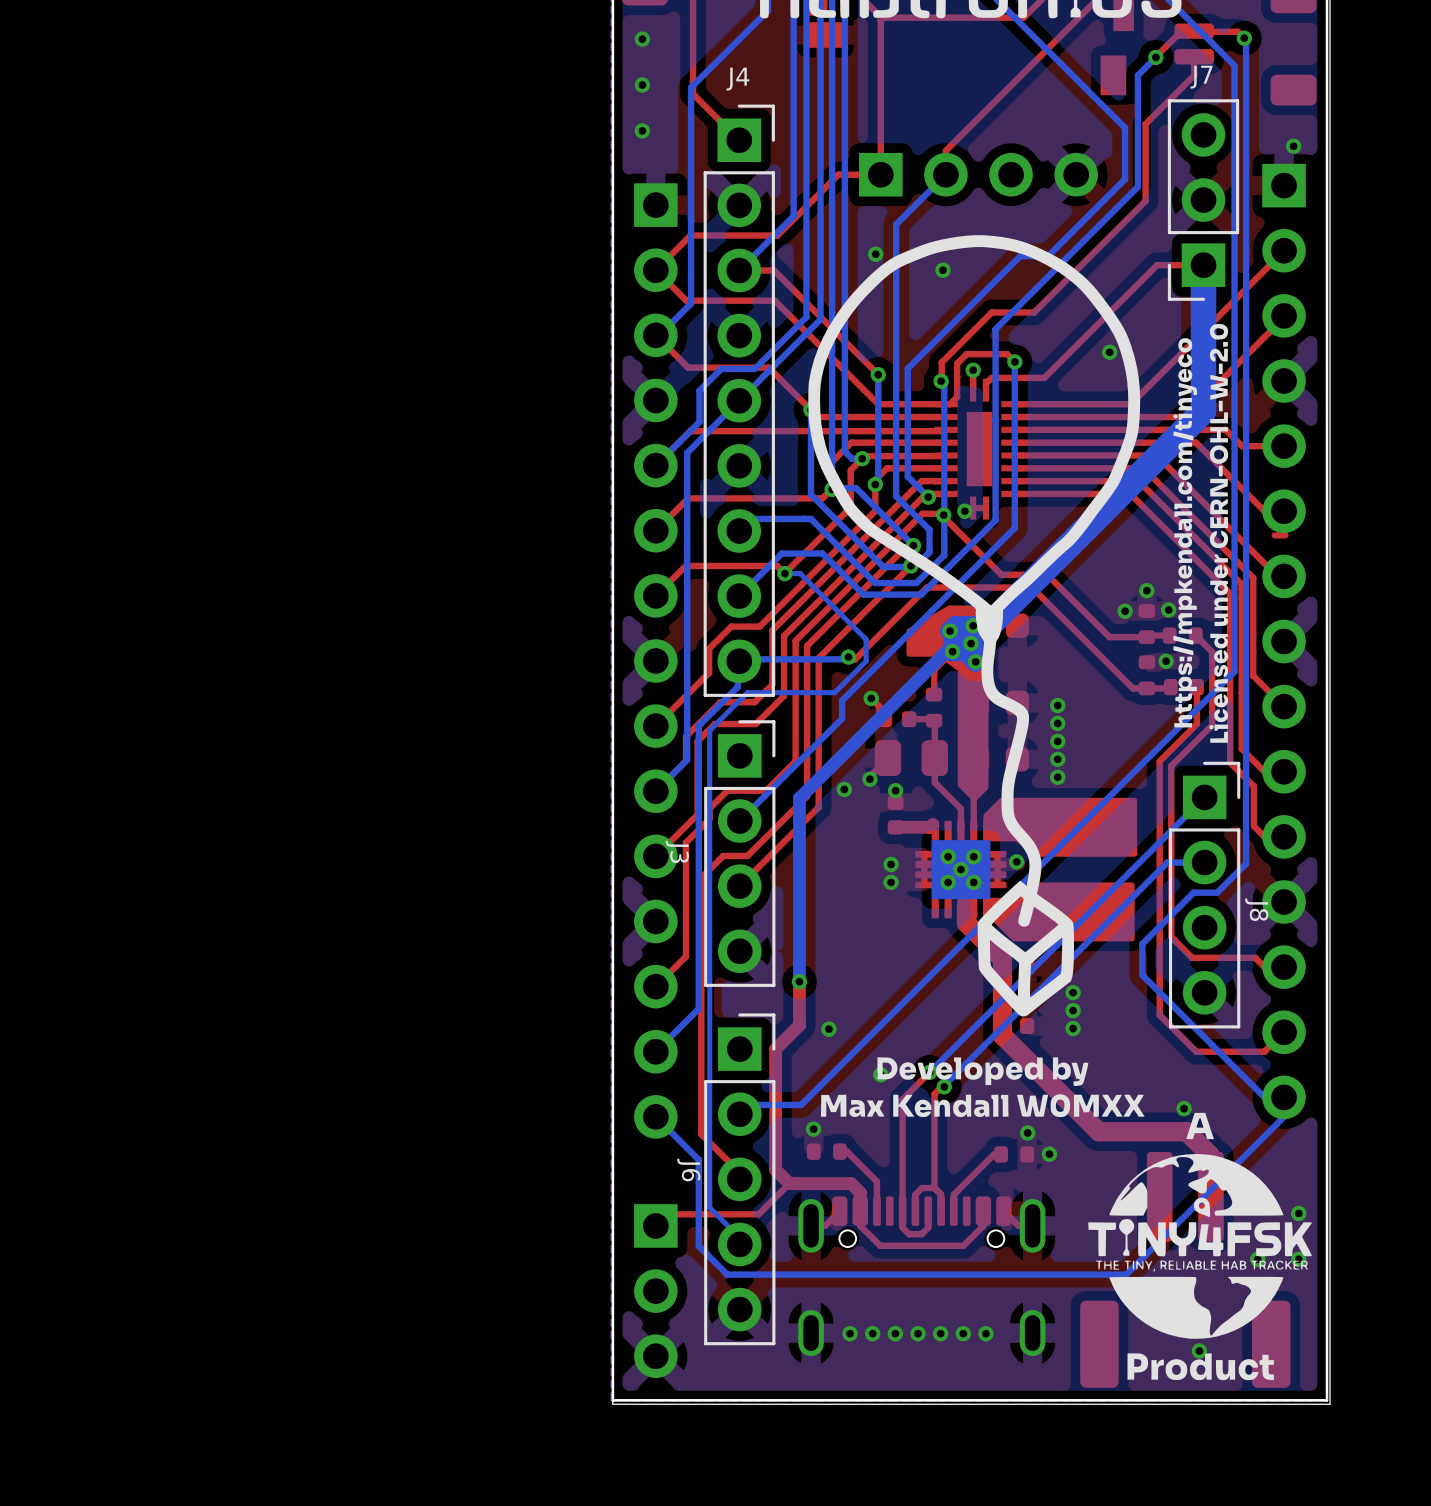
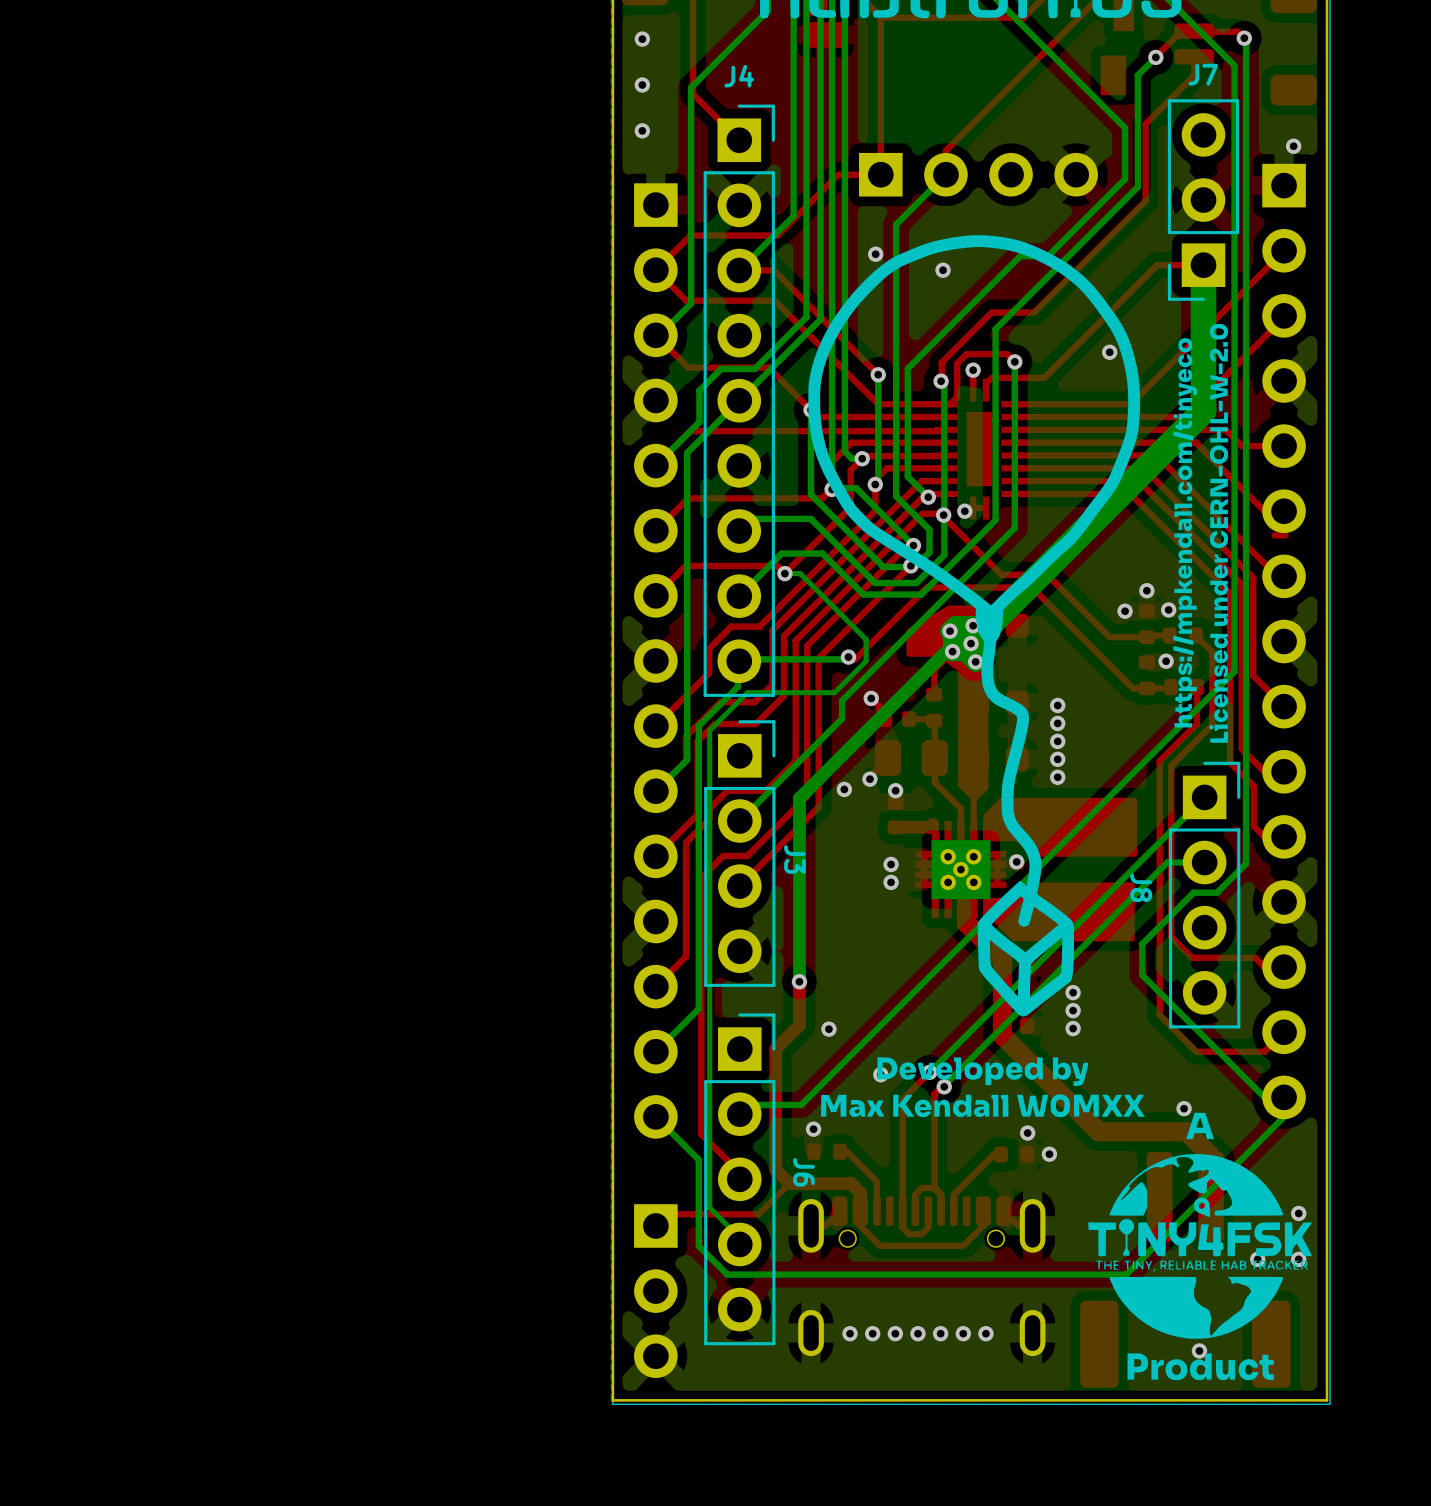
J3 name position: J3 (677, 851) -> J3 (794, 859)
J8 name position: J8 (1256, 909) -> J8 (1141, 887)
J6 name position: J6 (688, 1170) -> J6 (803, 1172)

